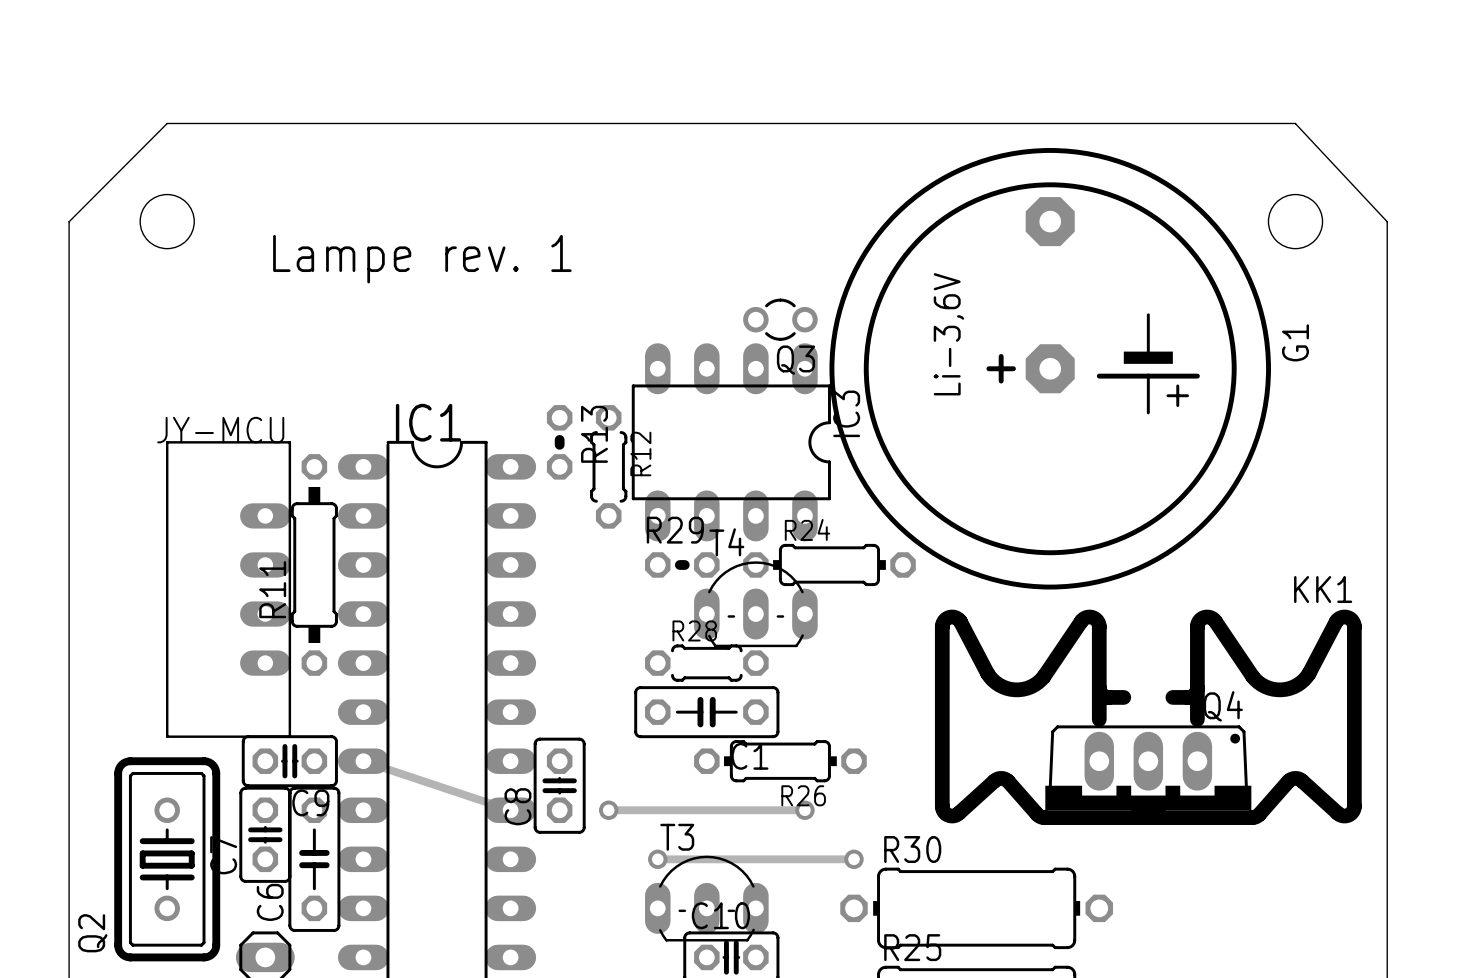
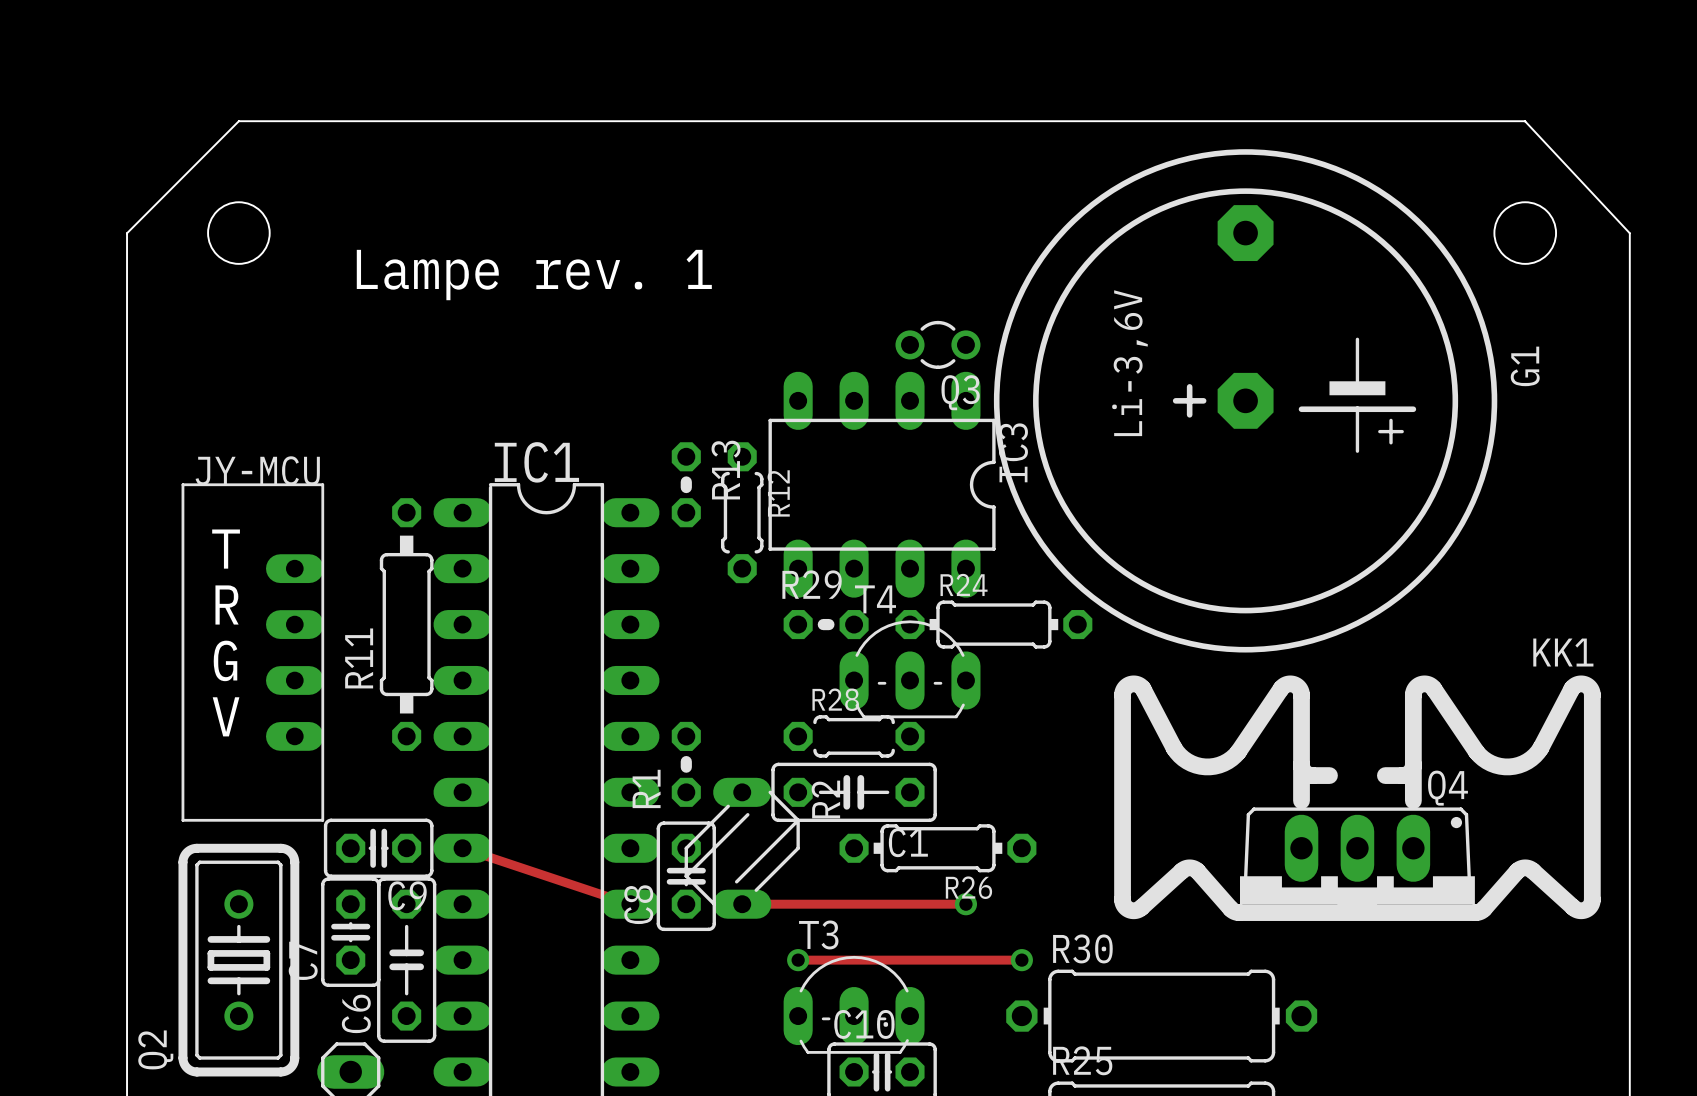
text: none -> T (226, 549)
text: none -> R (227, 604)
part position: (228, 589) -> (252, 652)
text: none -> G (225, 660)
text: none -> V (226, 716)
R1: none -> (686, 764)
R2: none -> (742, 848)

